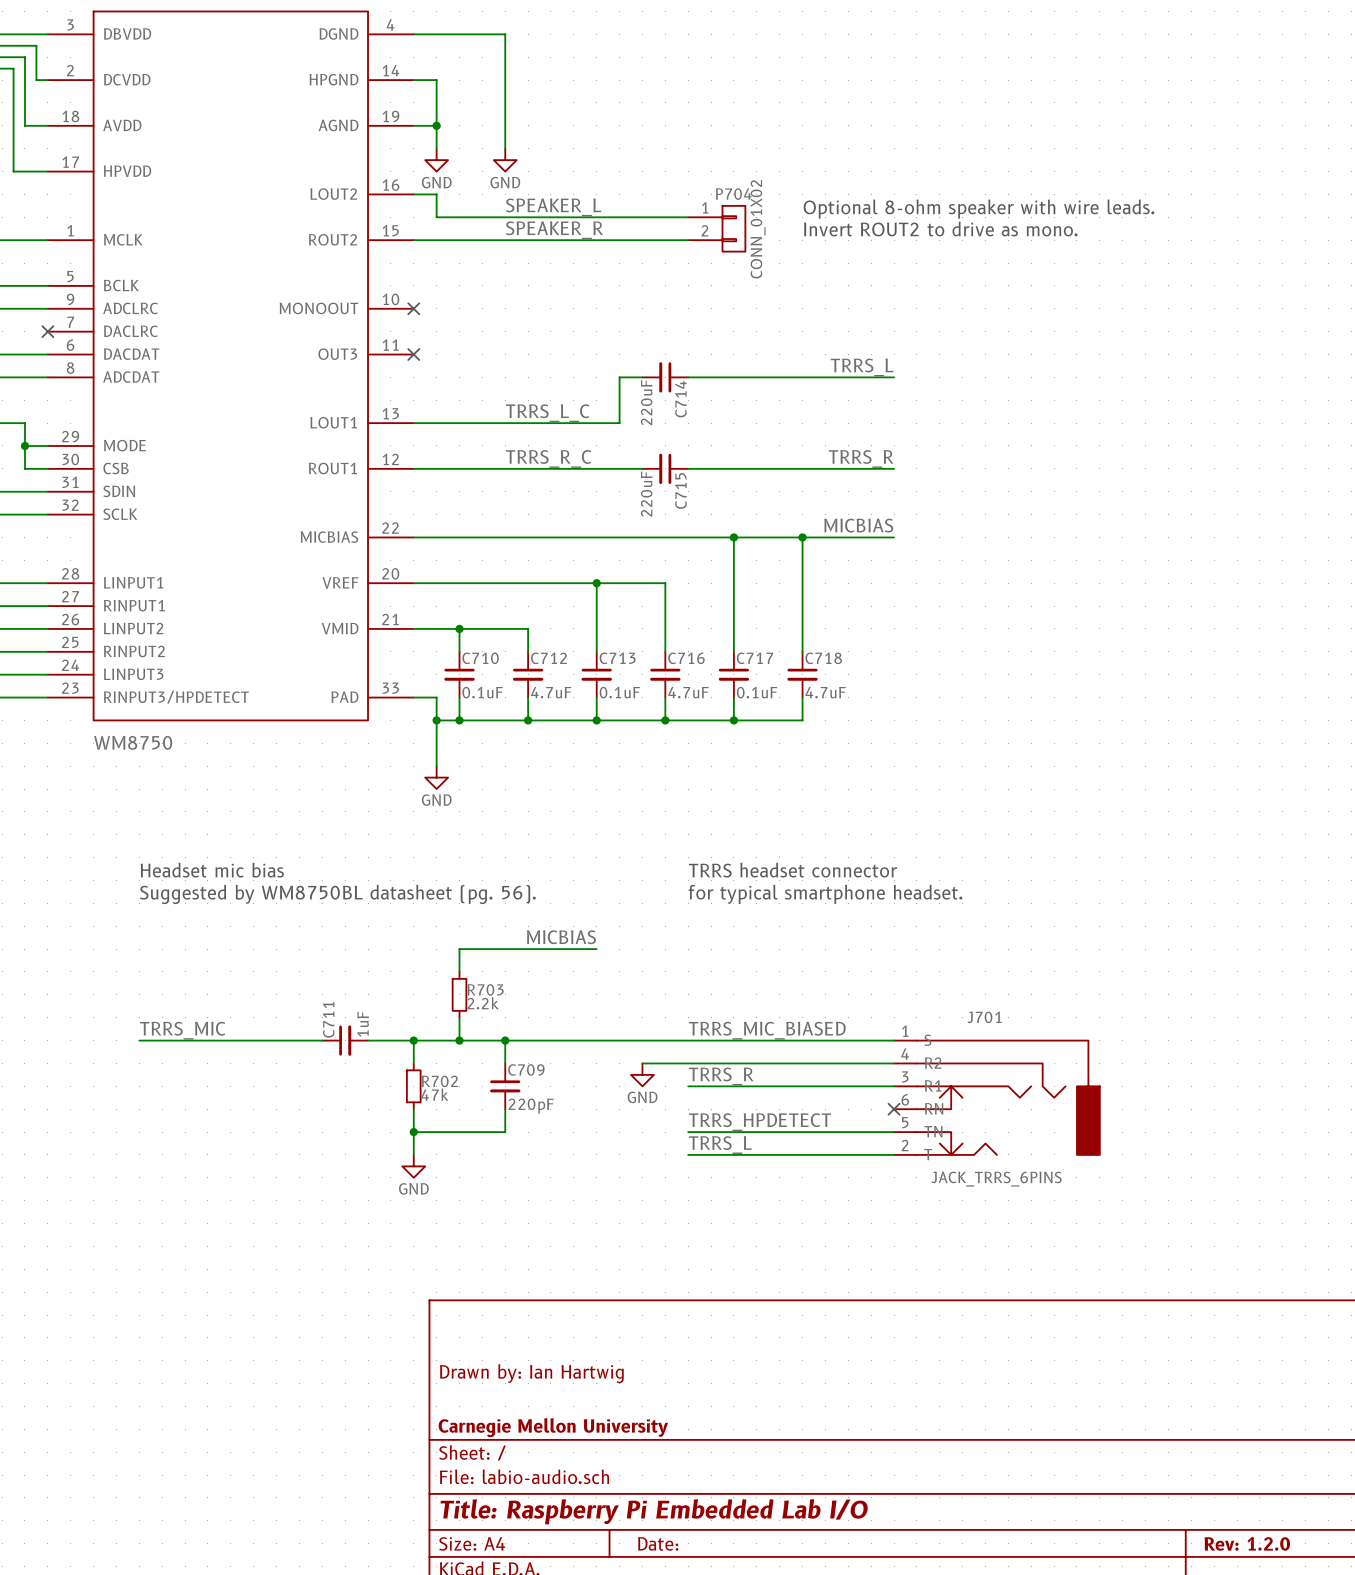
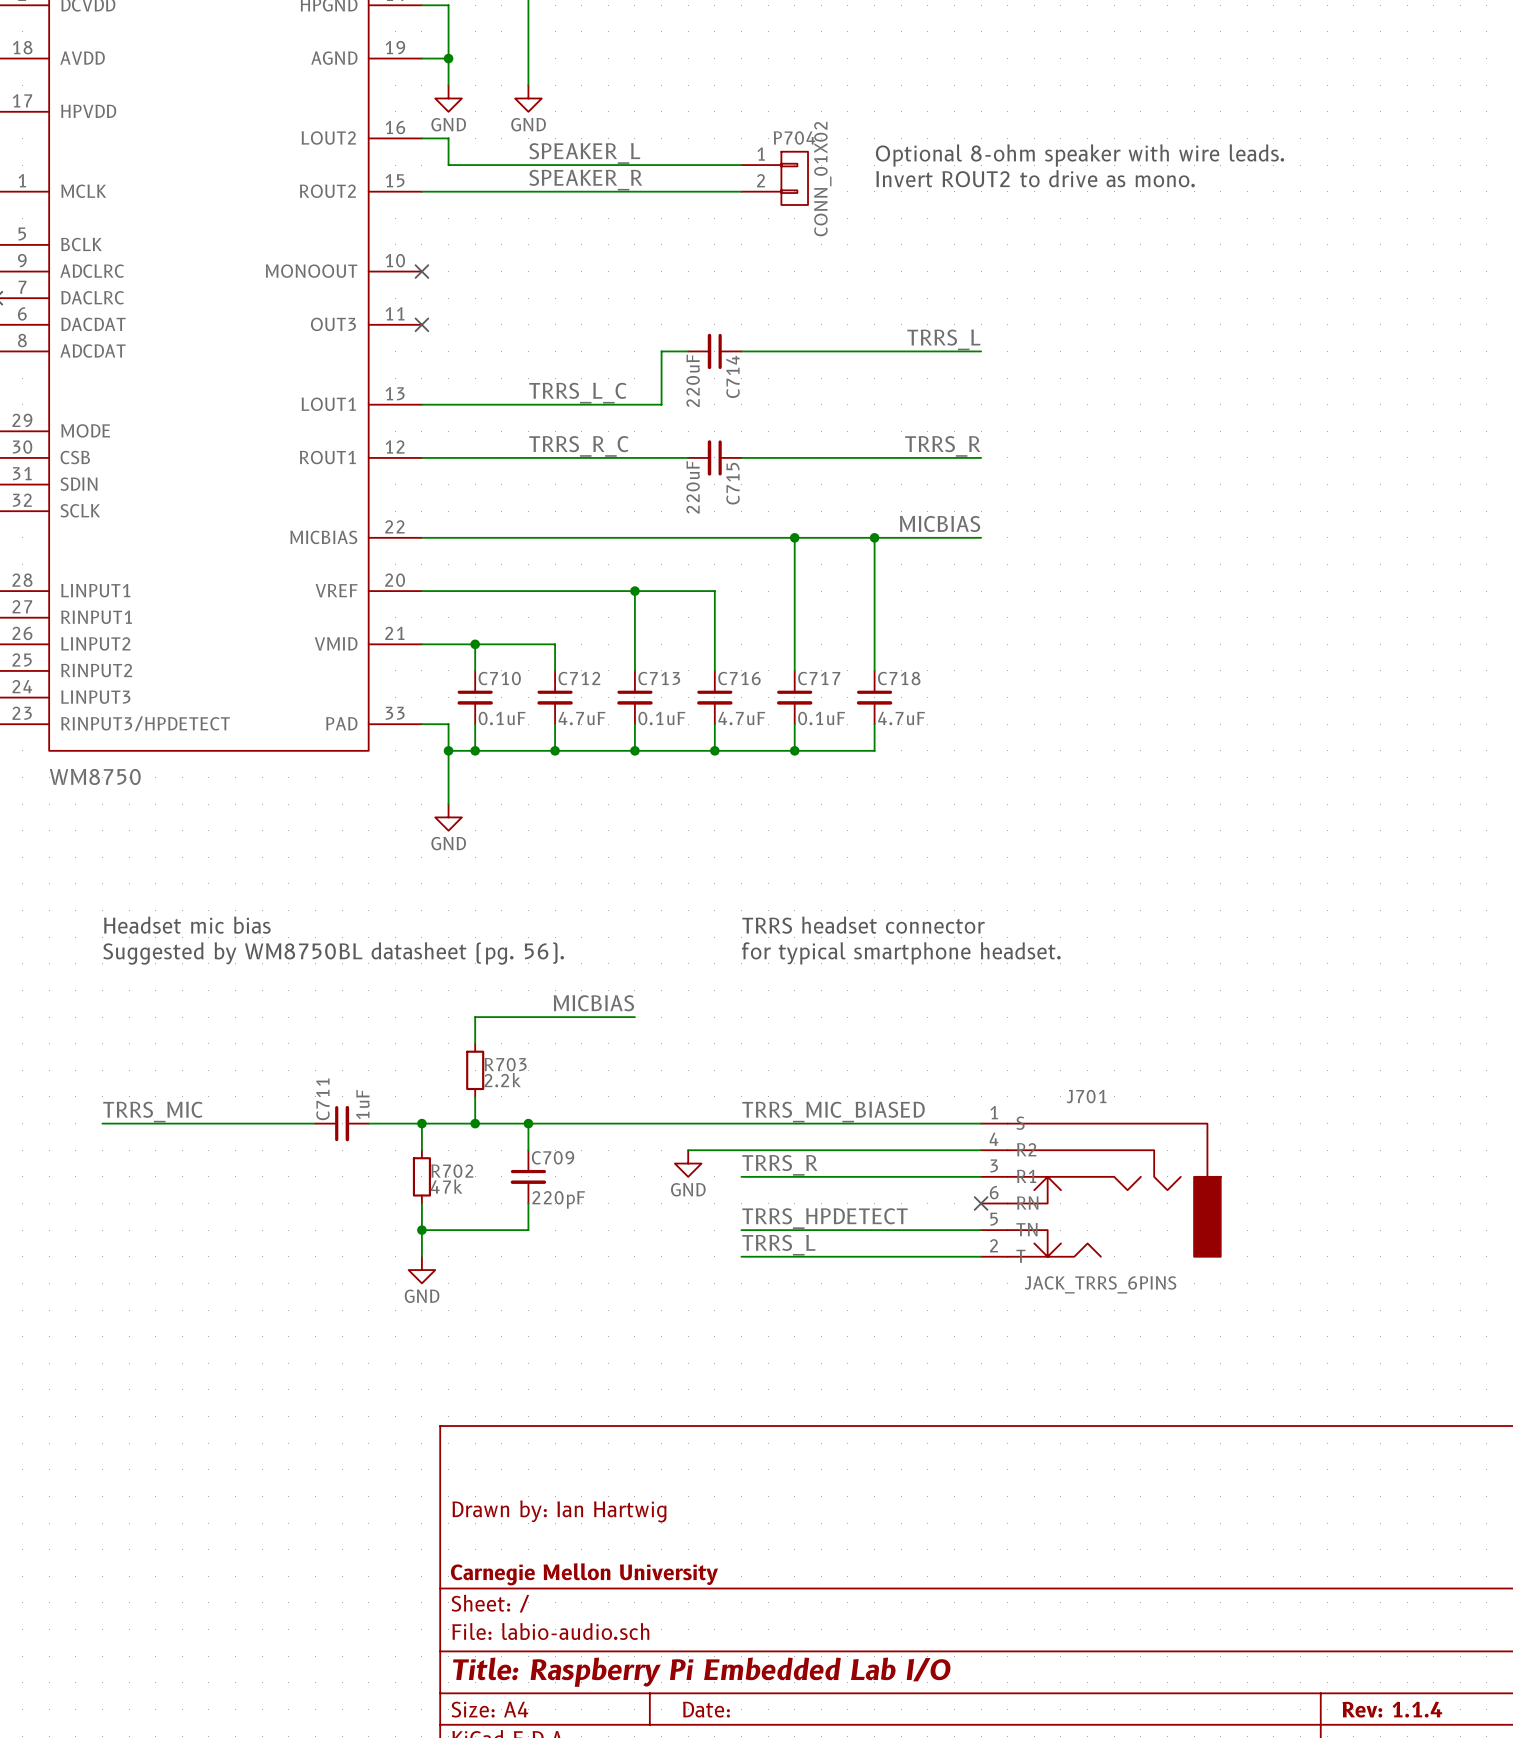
title block: Rev: 1.2.0 (1247, 1543) -> Rev: 1.1.4 (1392, 1709)

